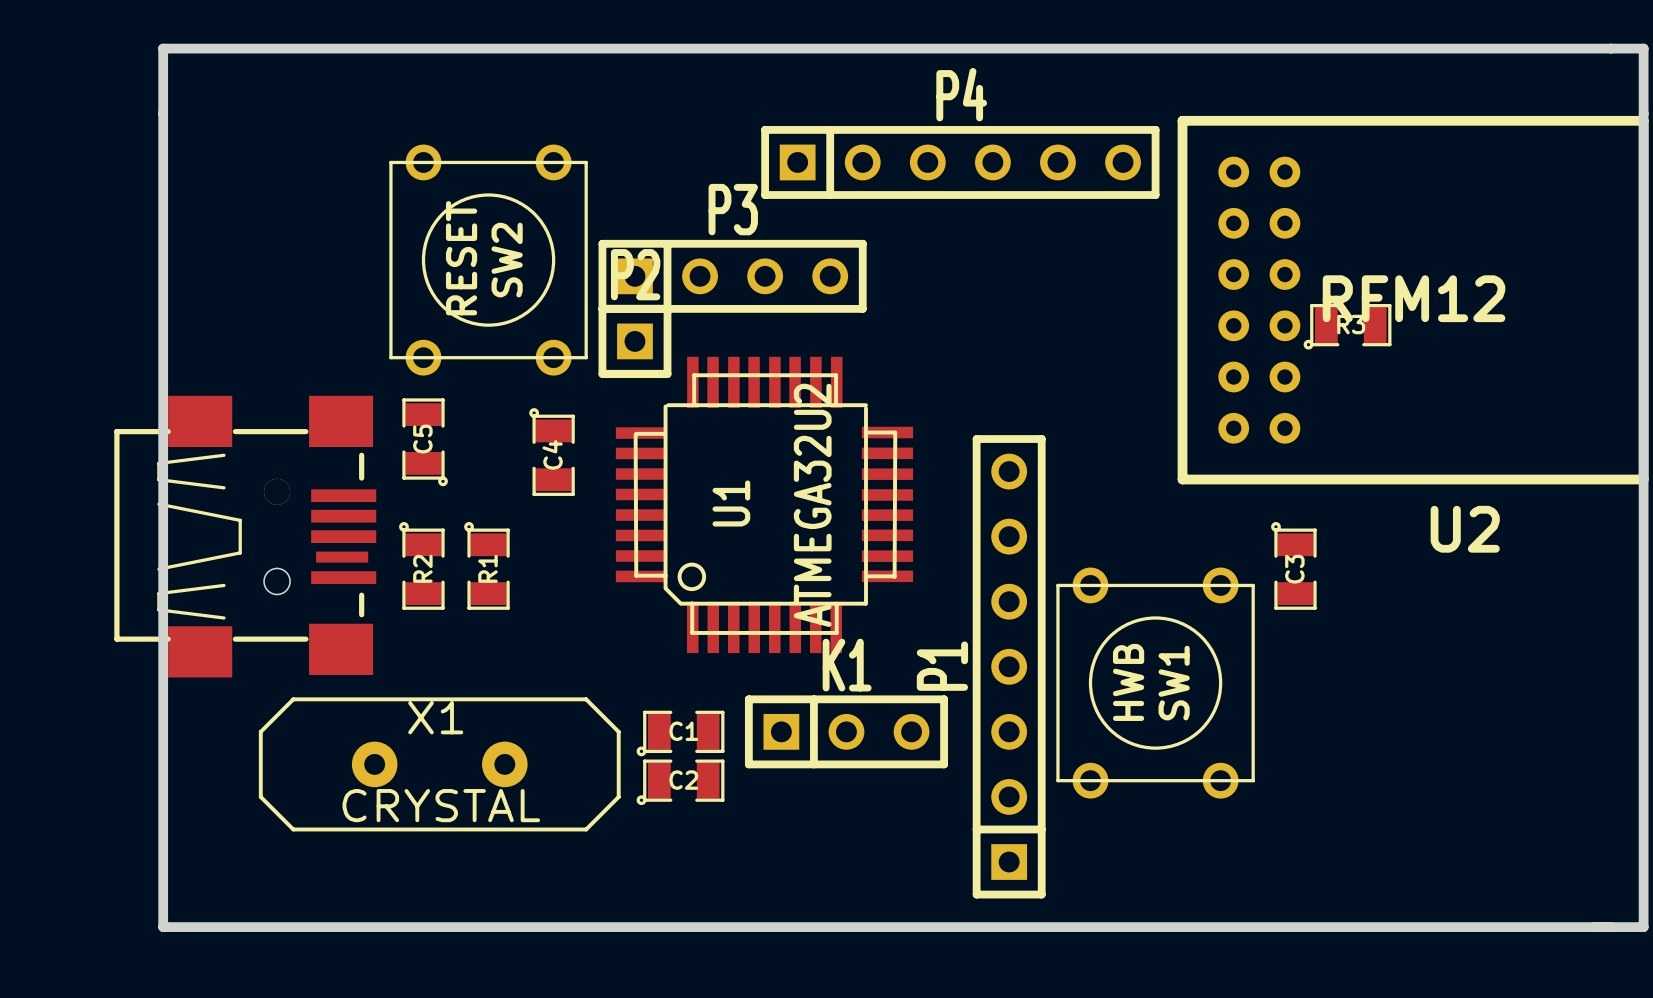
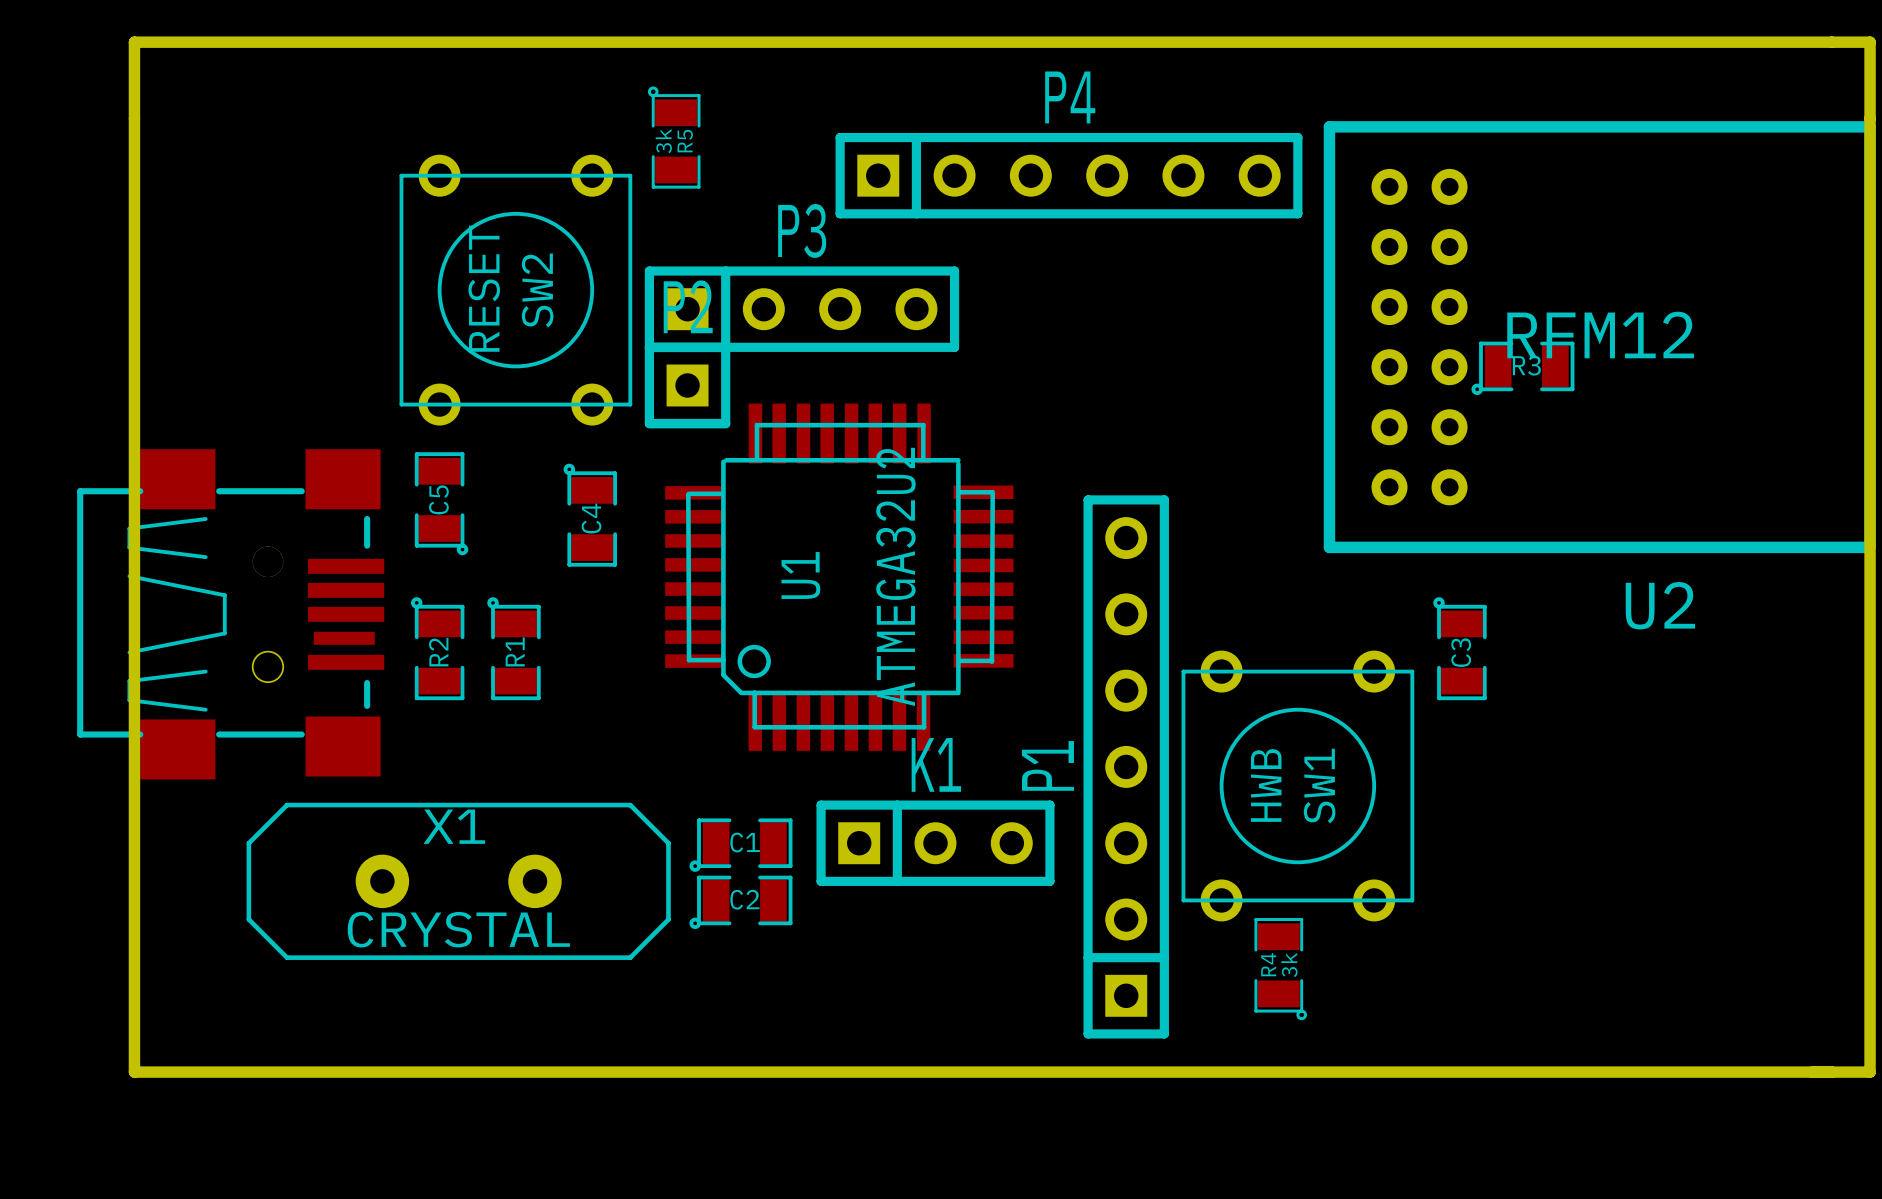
R5: none -> 3k (674, 137)
R4: none -> 3k (1280, 969)

